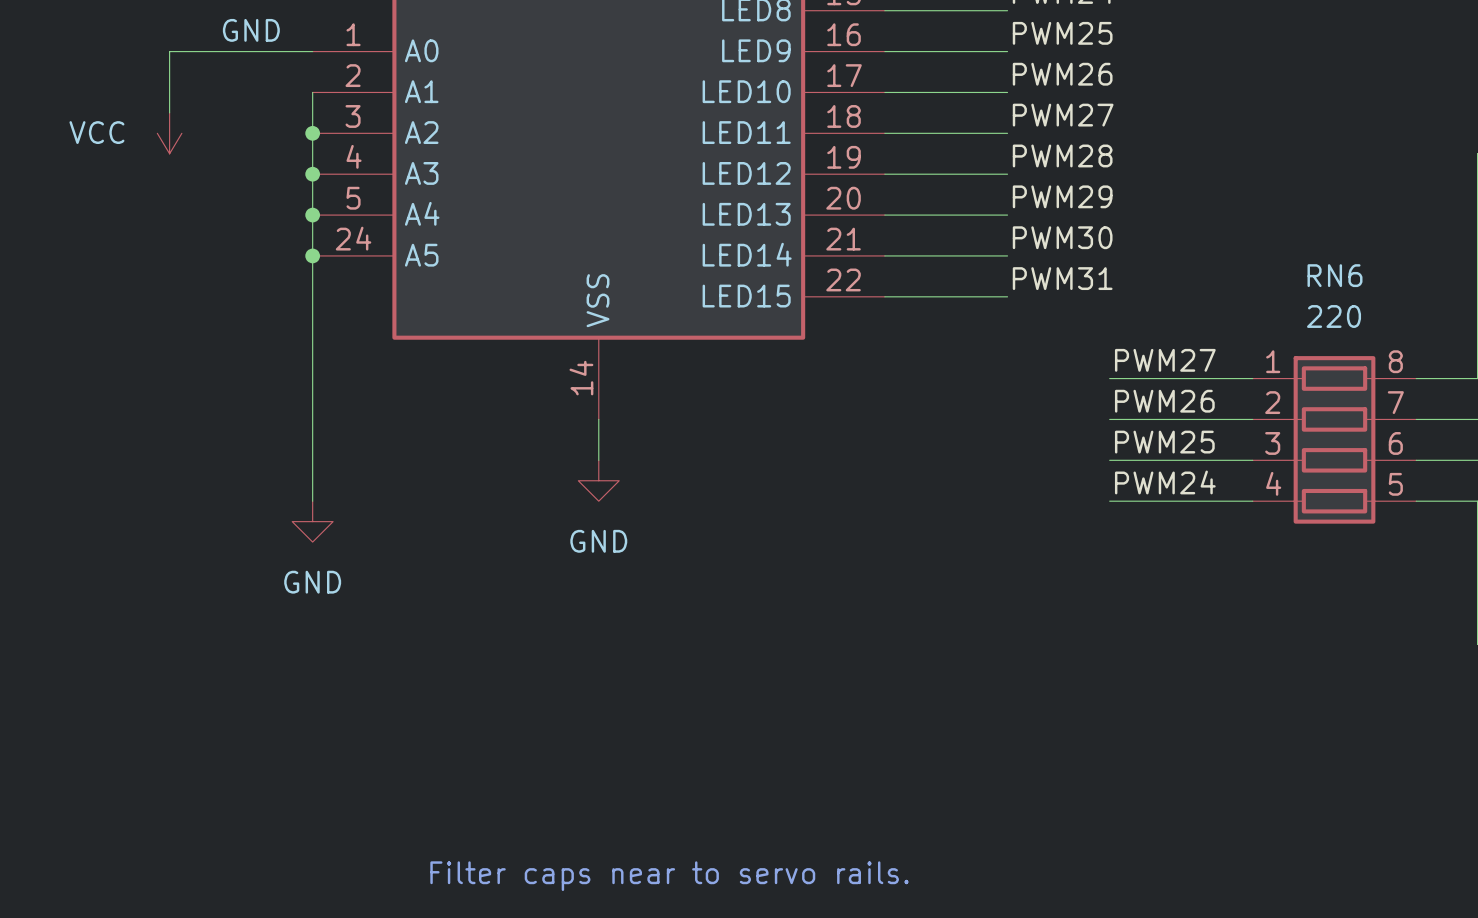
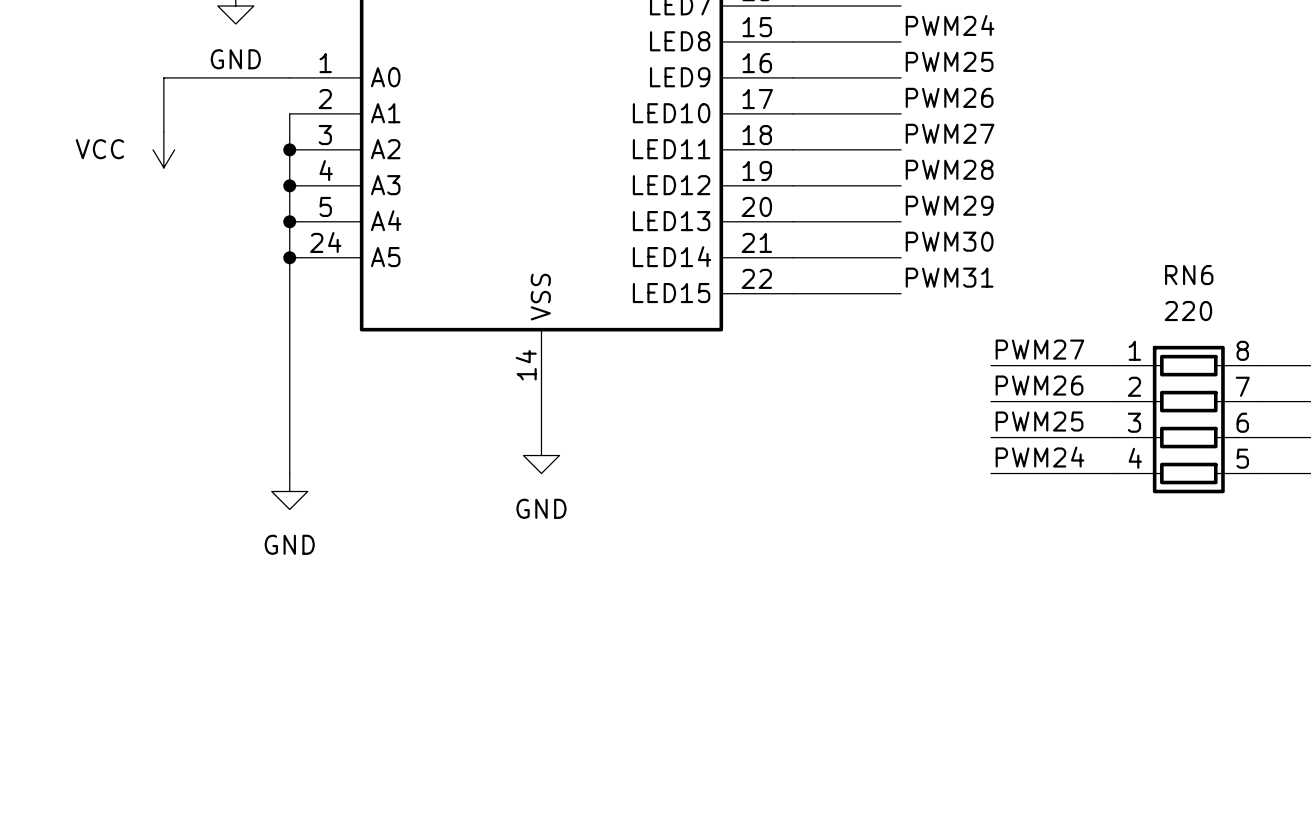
text: Filter caps near to servo rails. (669, 876) -> none

